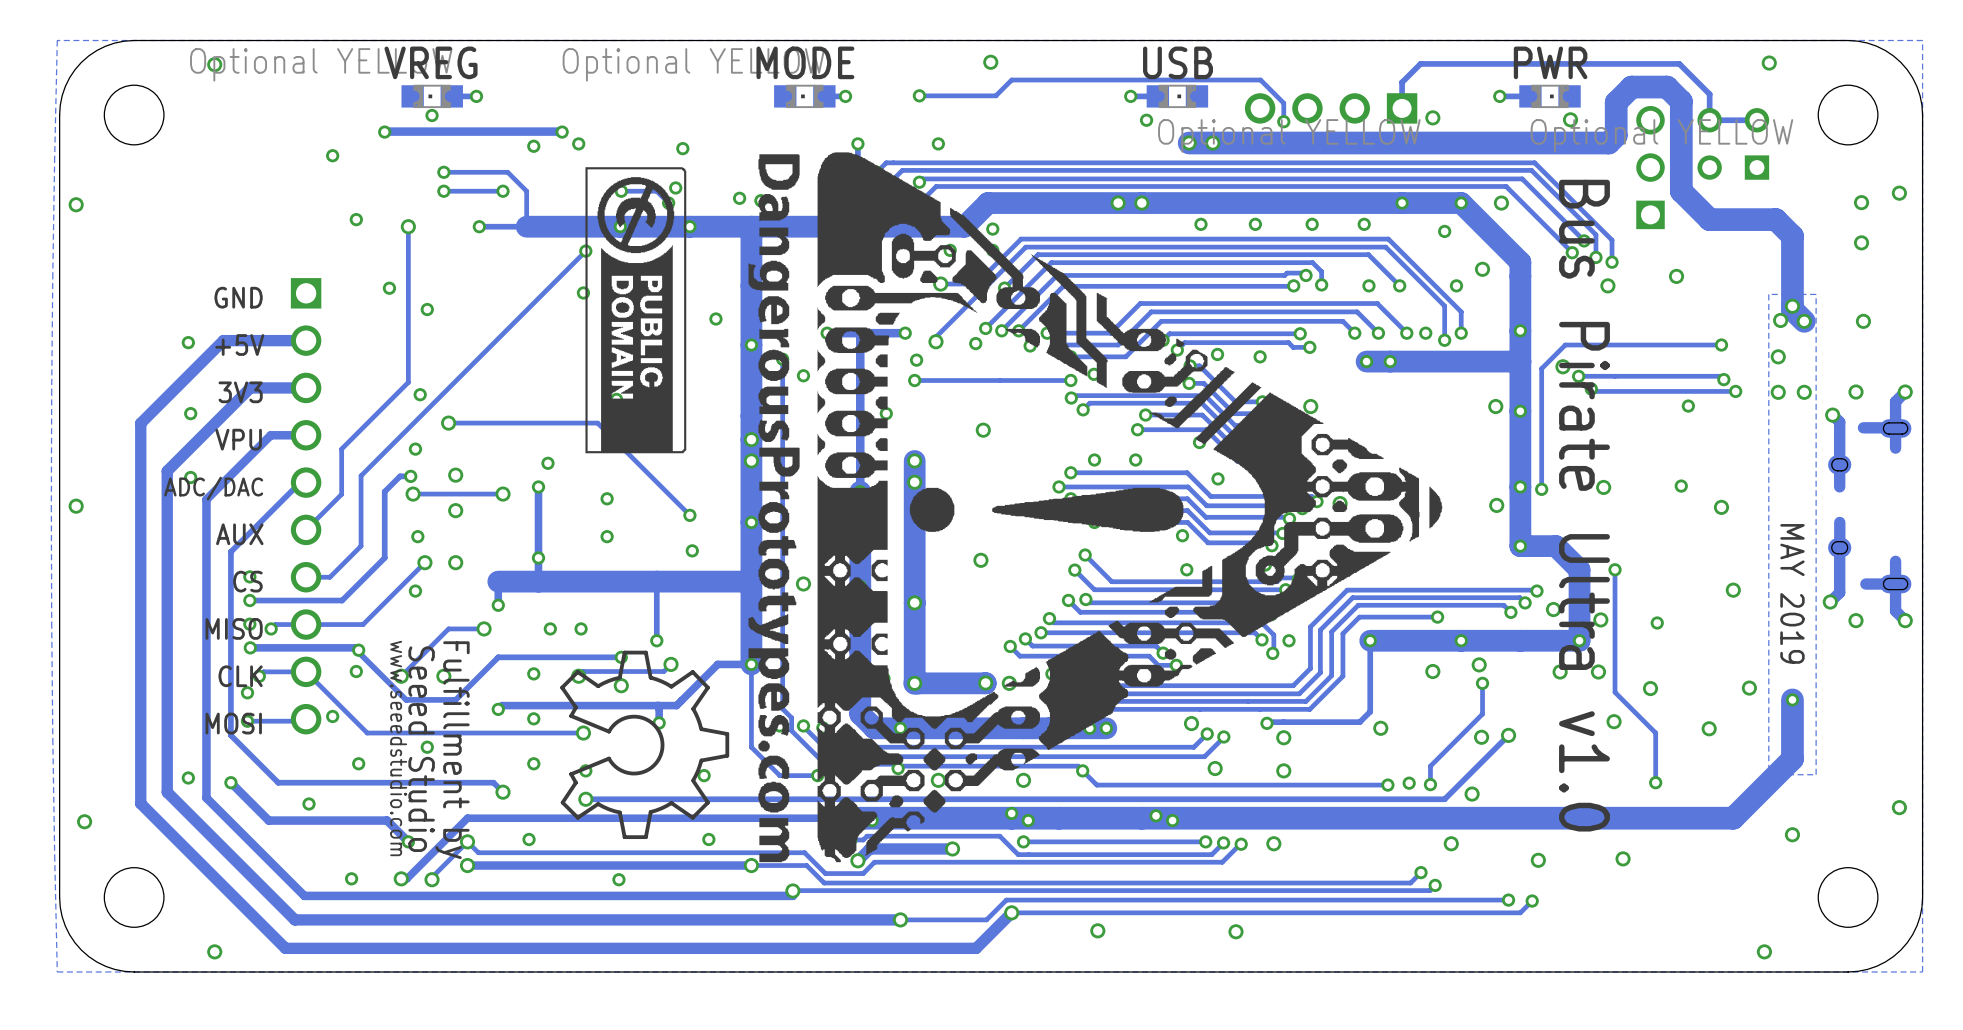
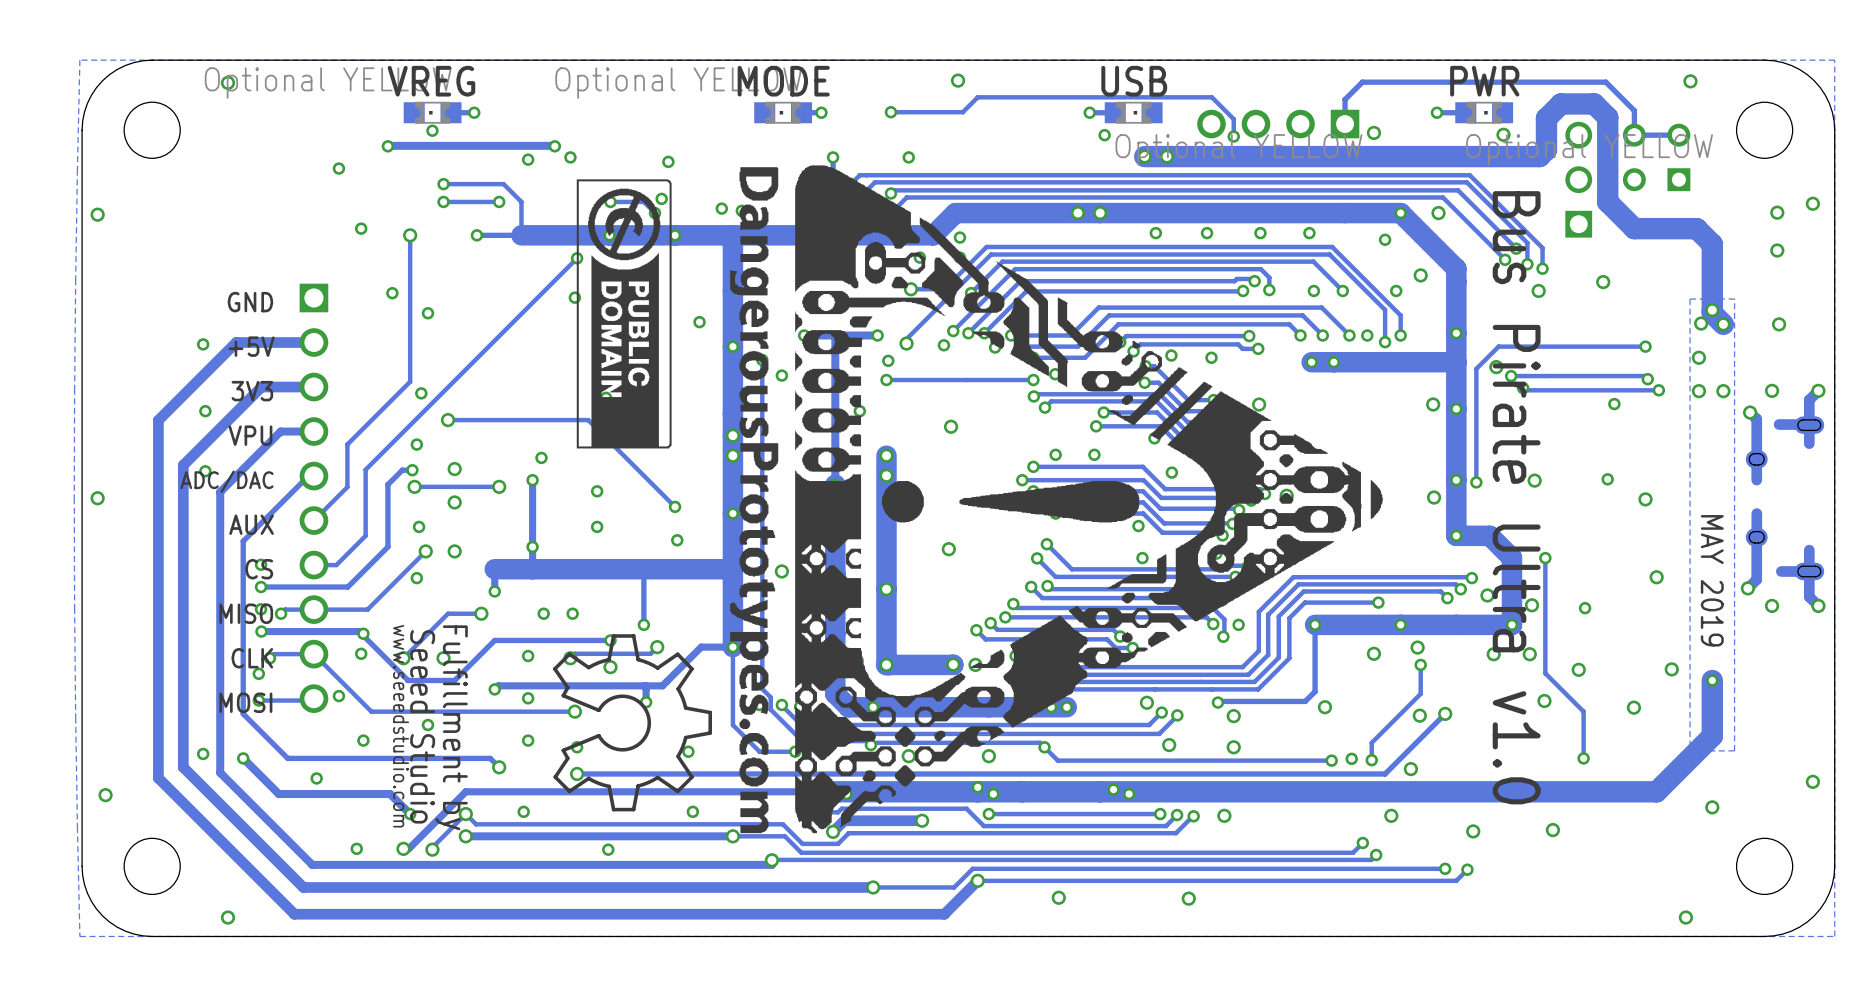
via: (1402, 203) -> none

